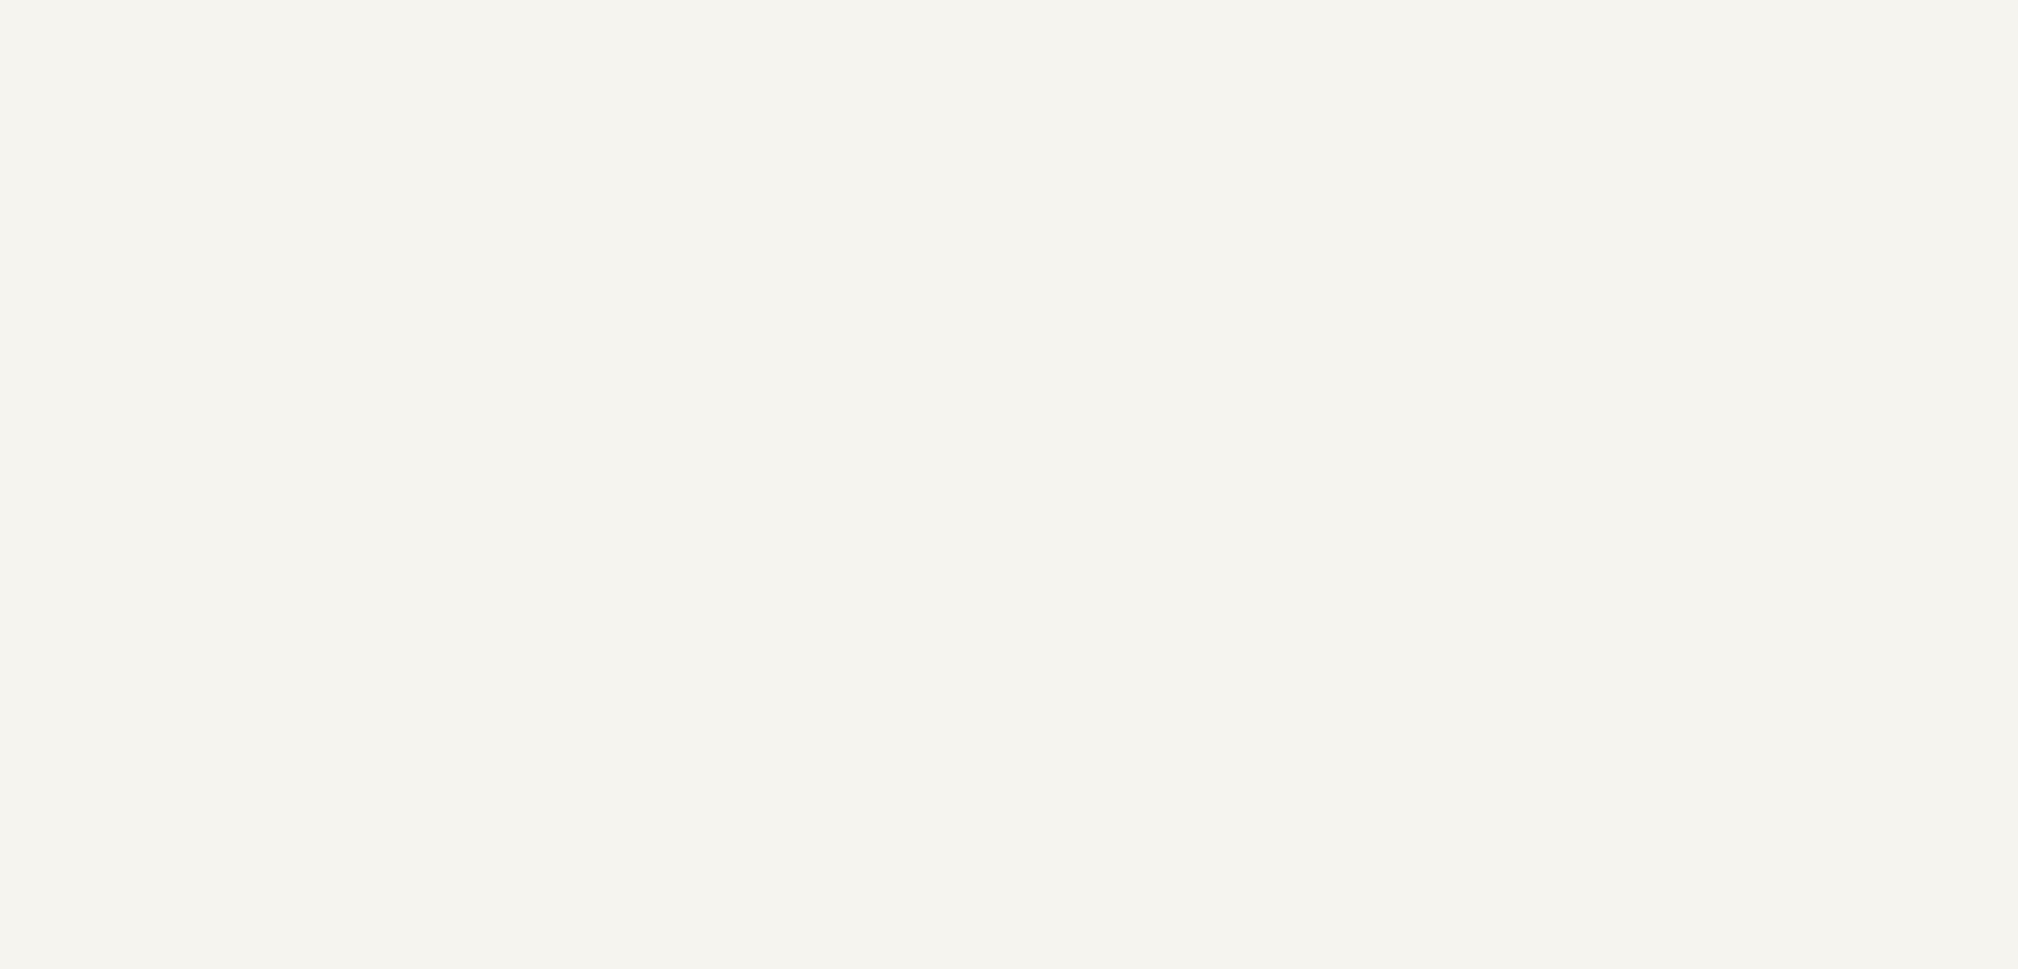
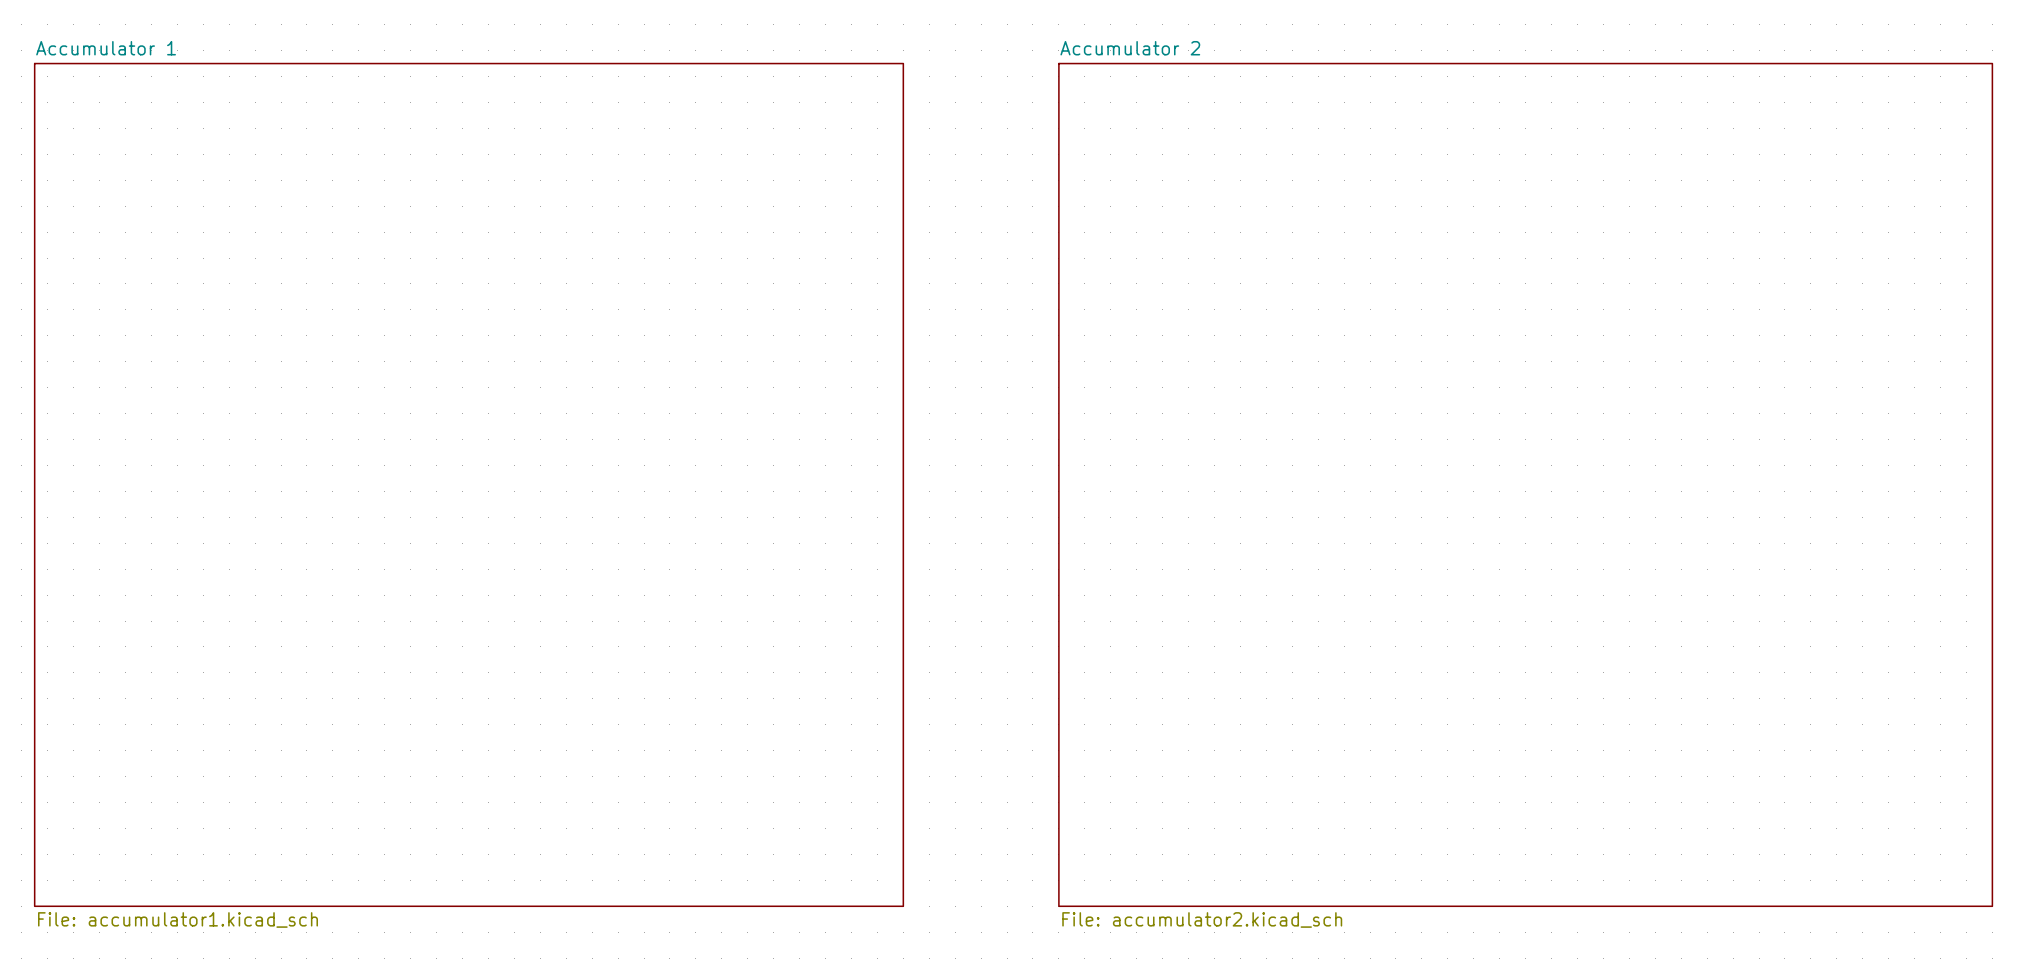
sheet Accumulator 1: none -> File: accumulator1.kicad_sch (469, 484)
sheet Accumulator 2: none -> File: accumulator2.kicad_sch (1525, 484)

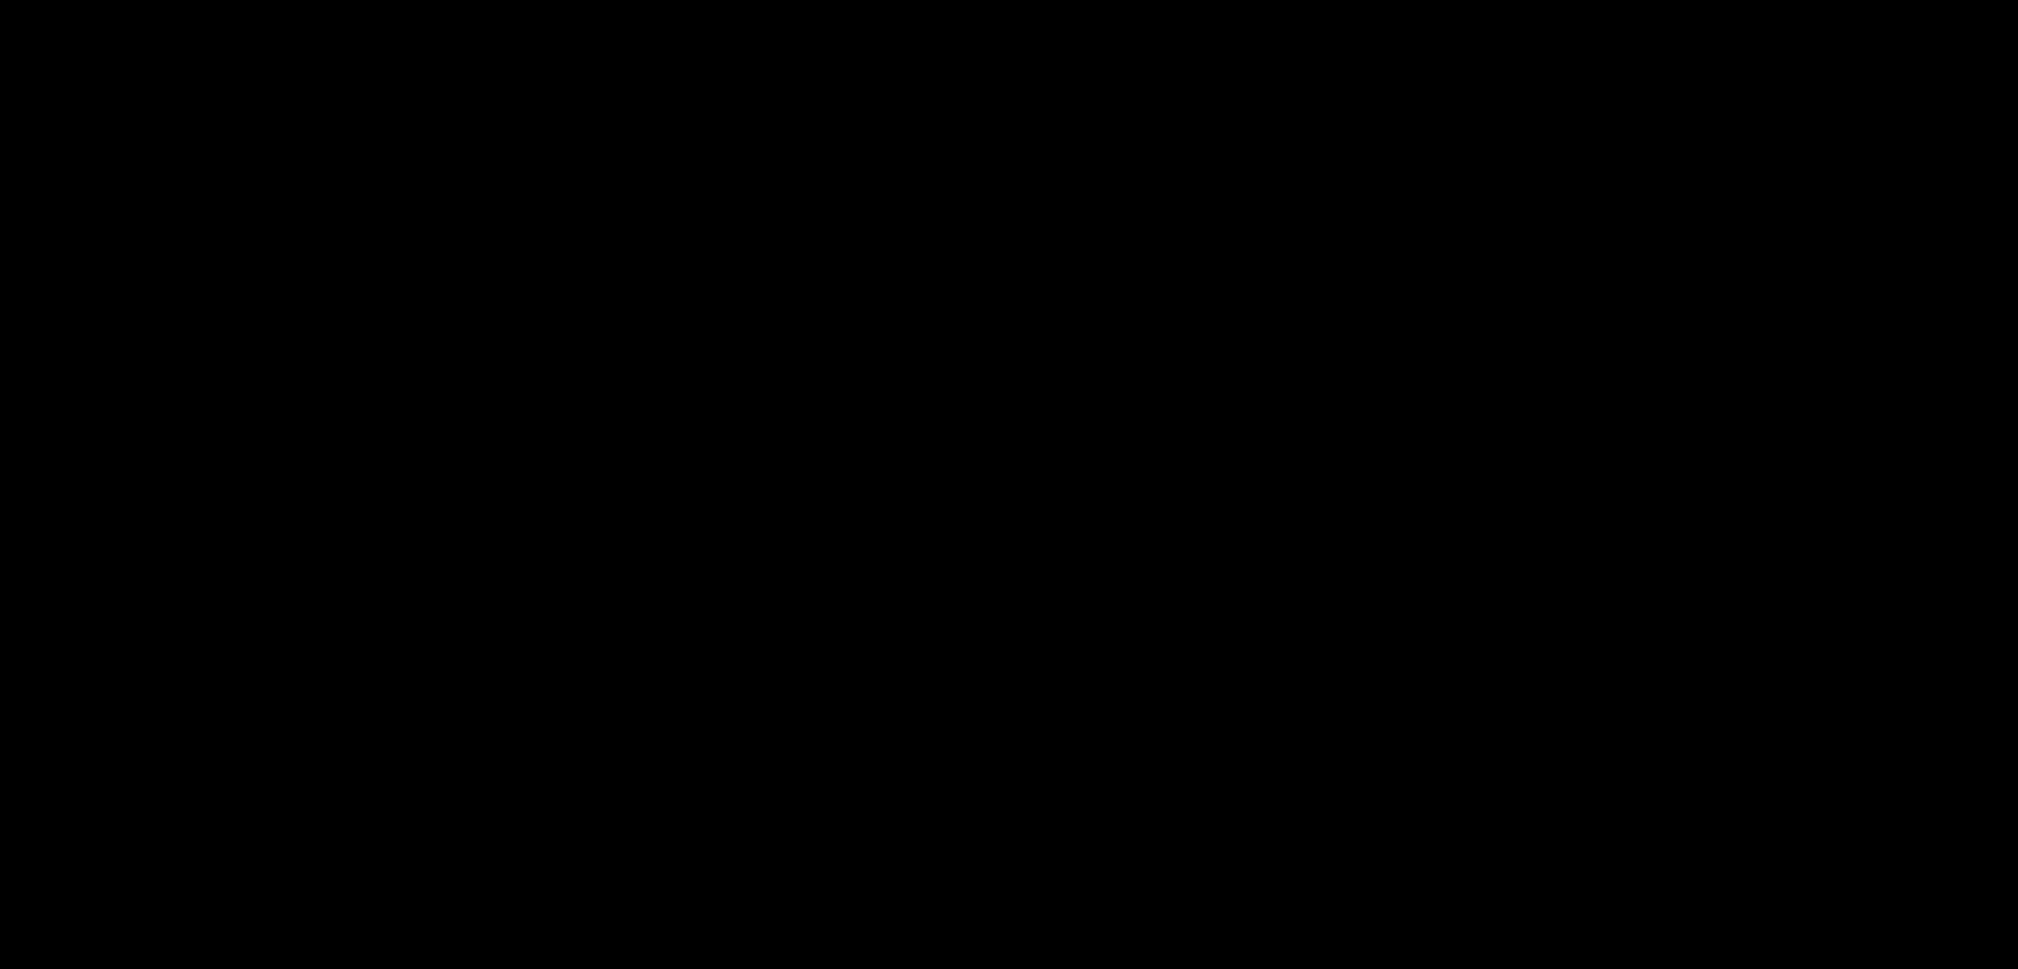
sheet Accumulator 1: File: accumulator1.kicad_sch (469, 484) -> none
sheet Accumulator 2: File: accumulator2.kicad_sch (1525, 484) -> none

